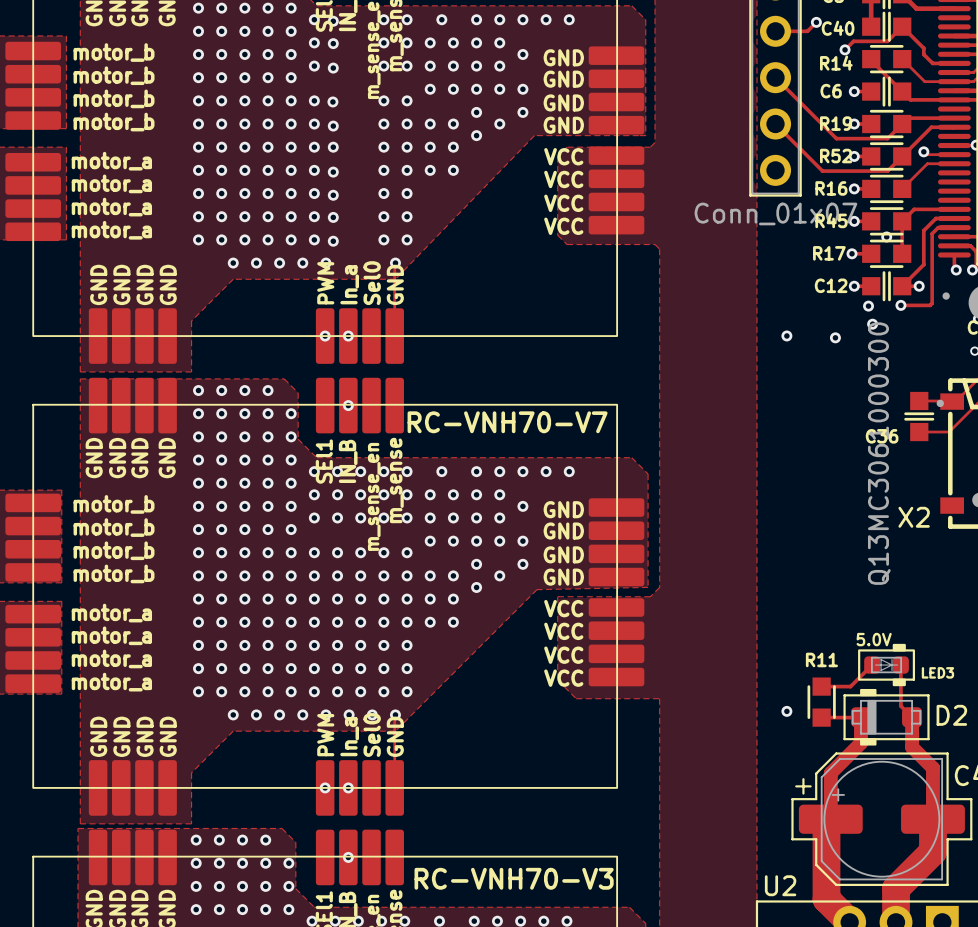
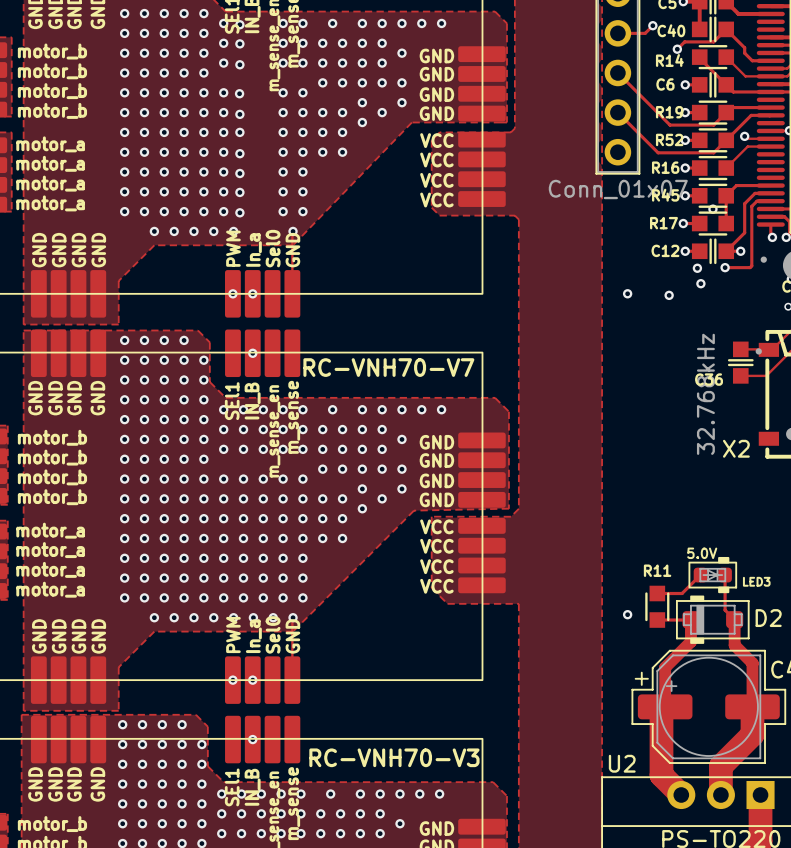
X2 value: Q13MC3061000300 (879, 453) -> 32.768kHz (705, 394)

